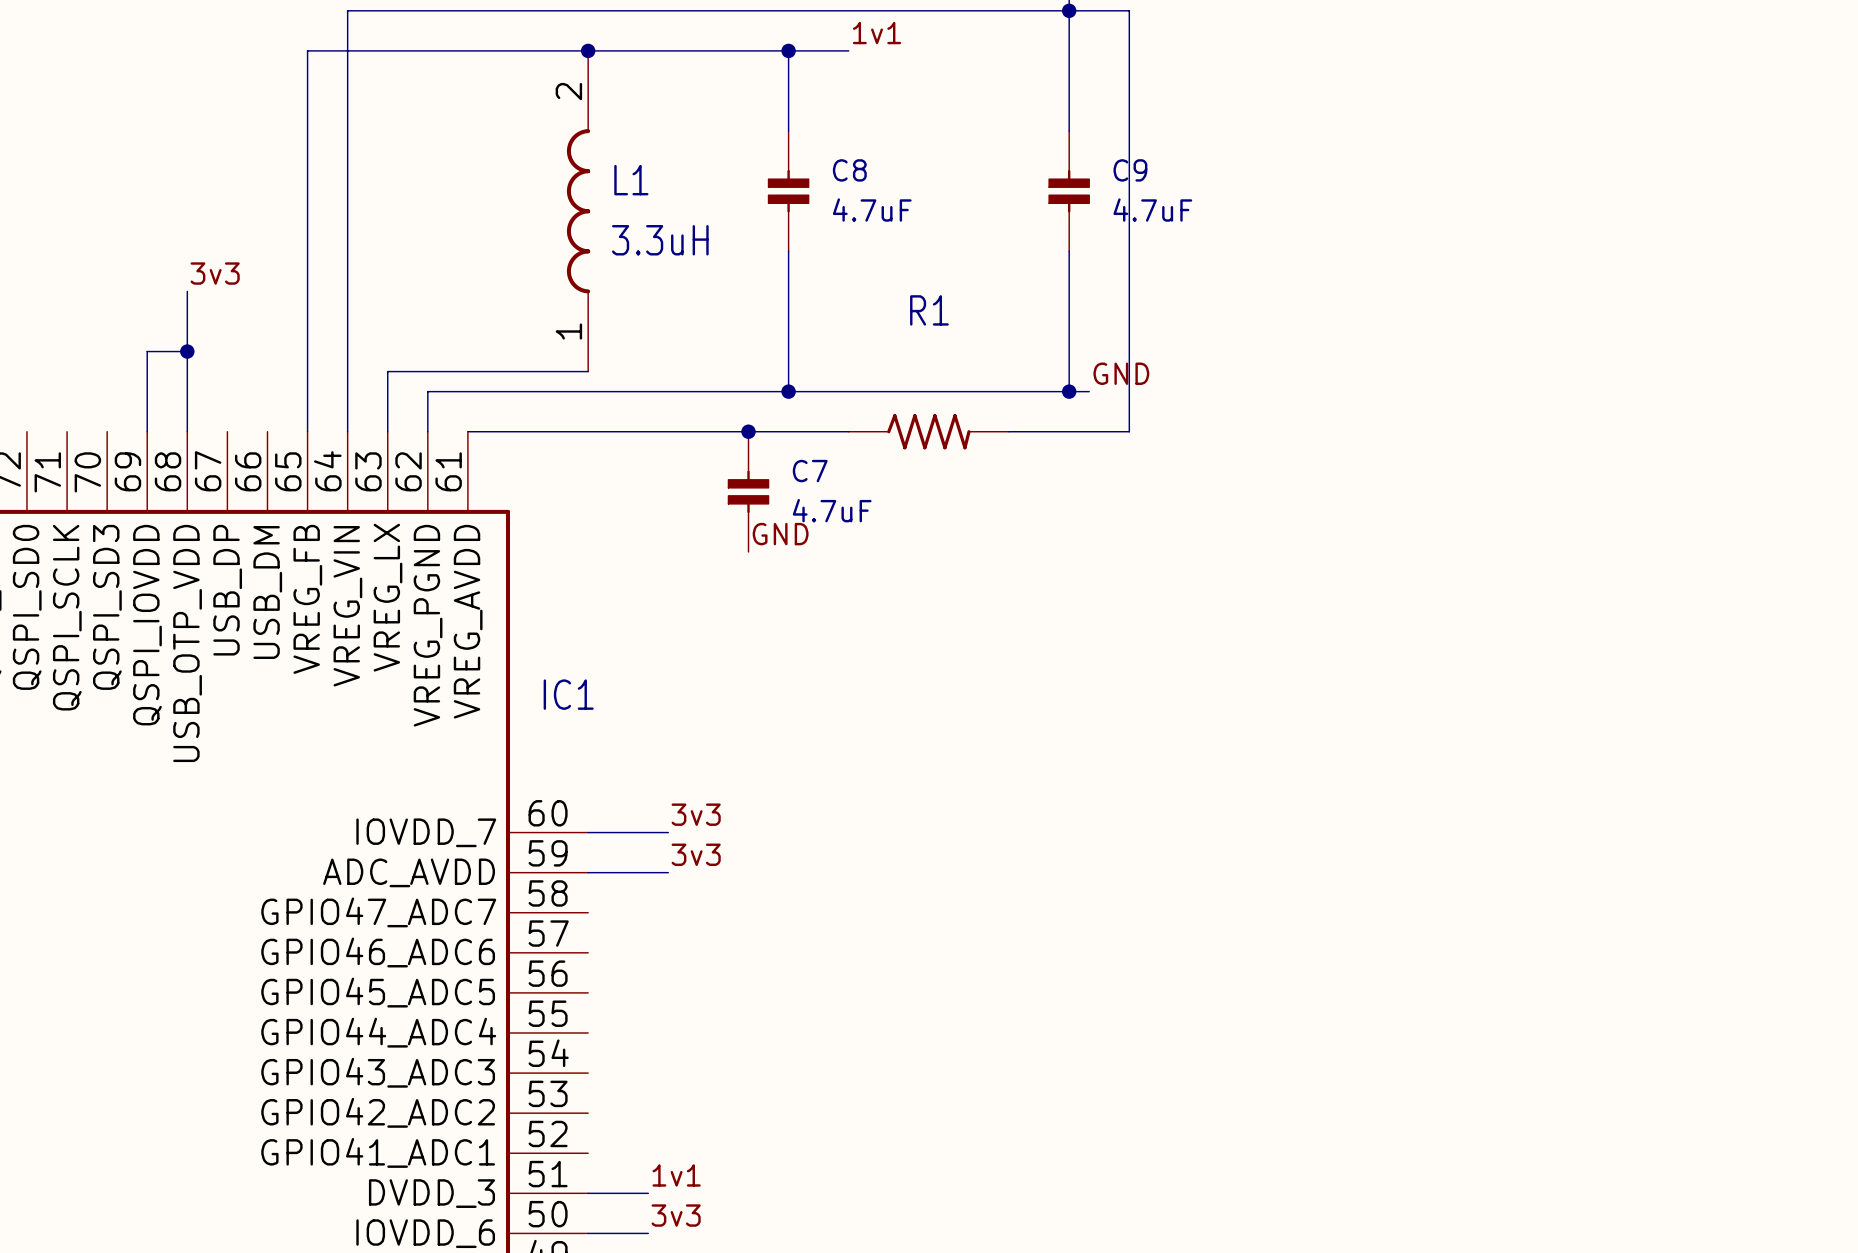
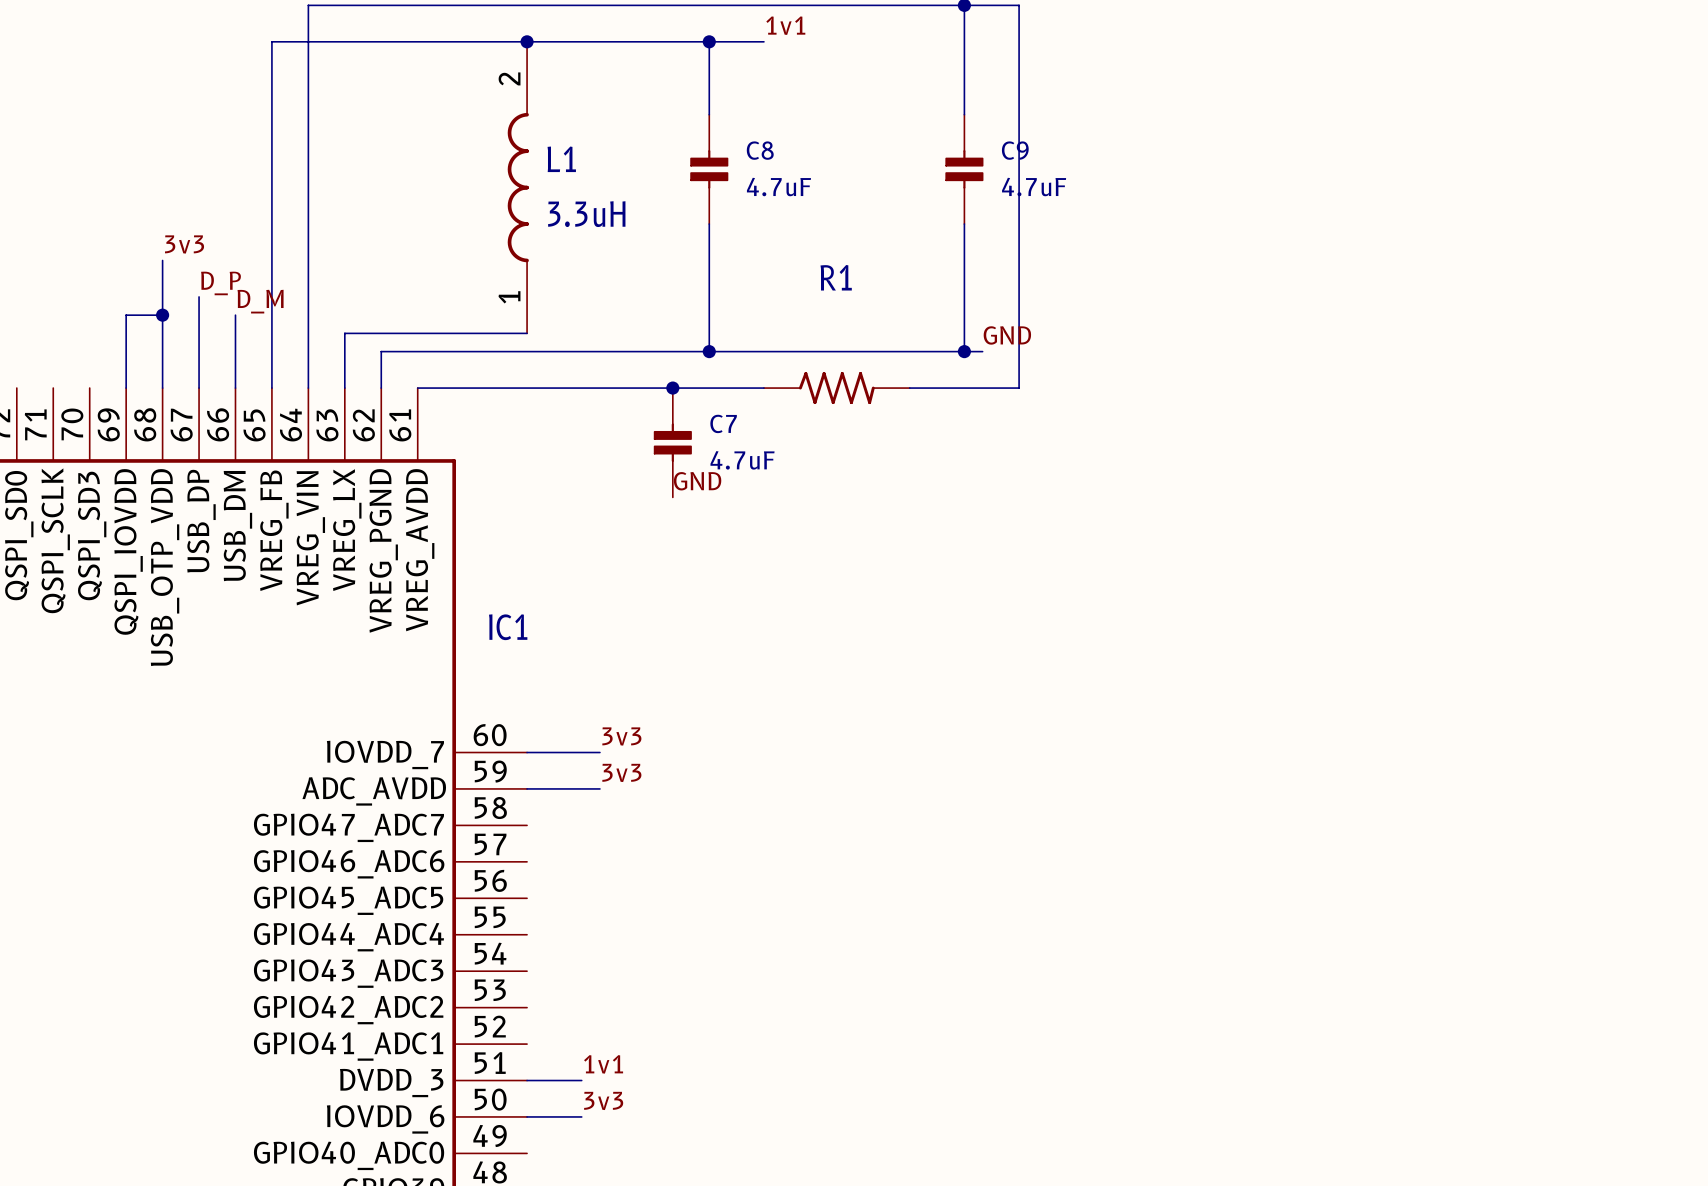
label: none -> D_P (220, 283)
wire: none -> (199, 296) (199, 388)
label: none -> D_M (260, 301)
wire: none -> (235, 315) (235, 388)

